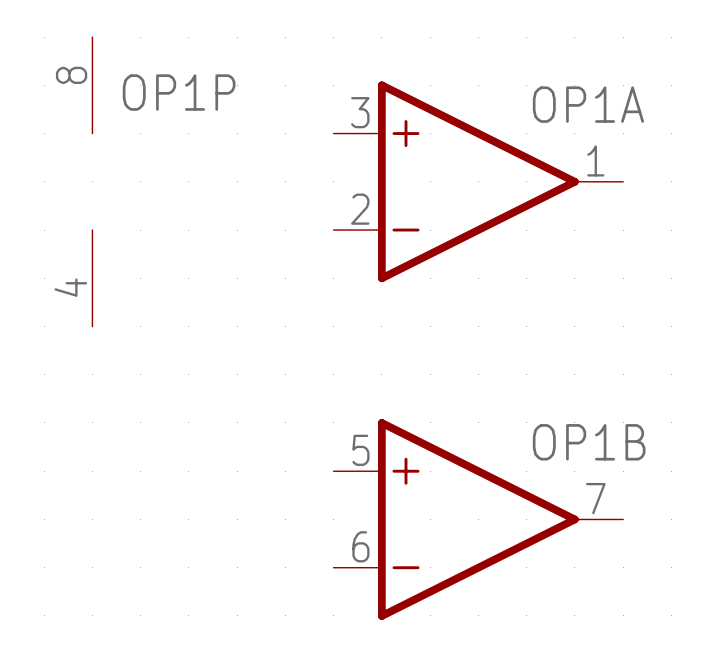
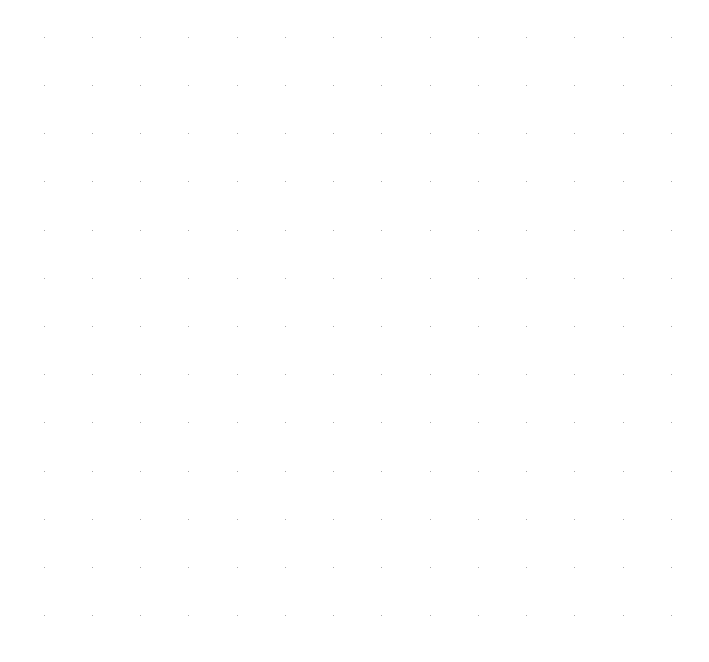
OP1P: (92, 181) -> none
OP1A: (478, 181) -> none
OP1B: (478, 519) -> none

